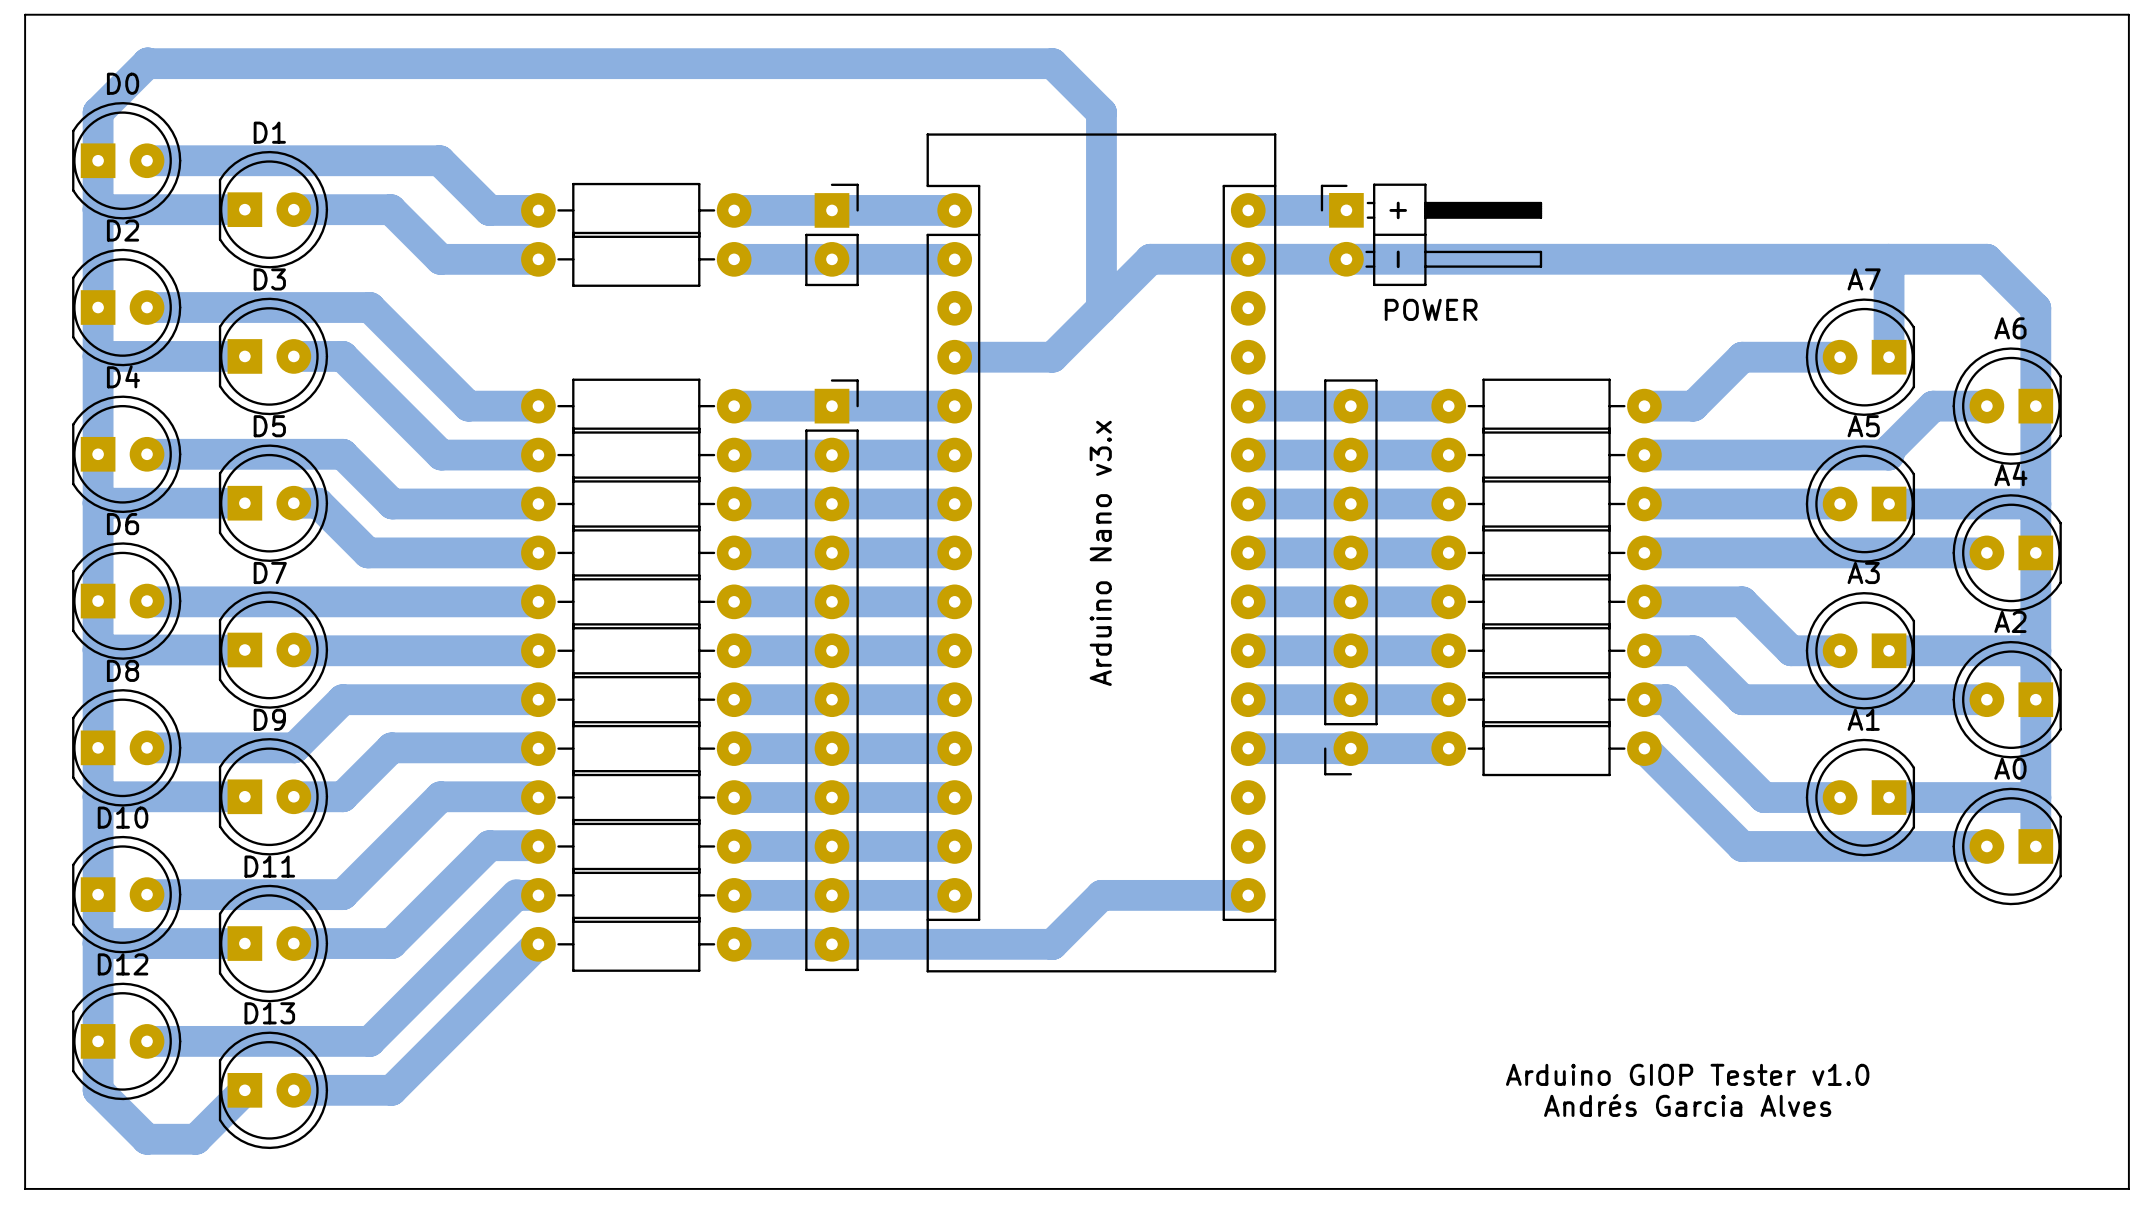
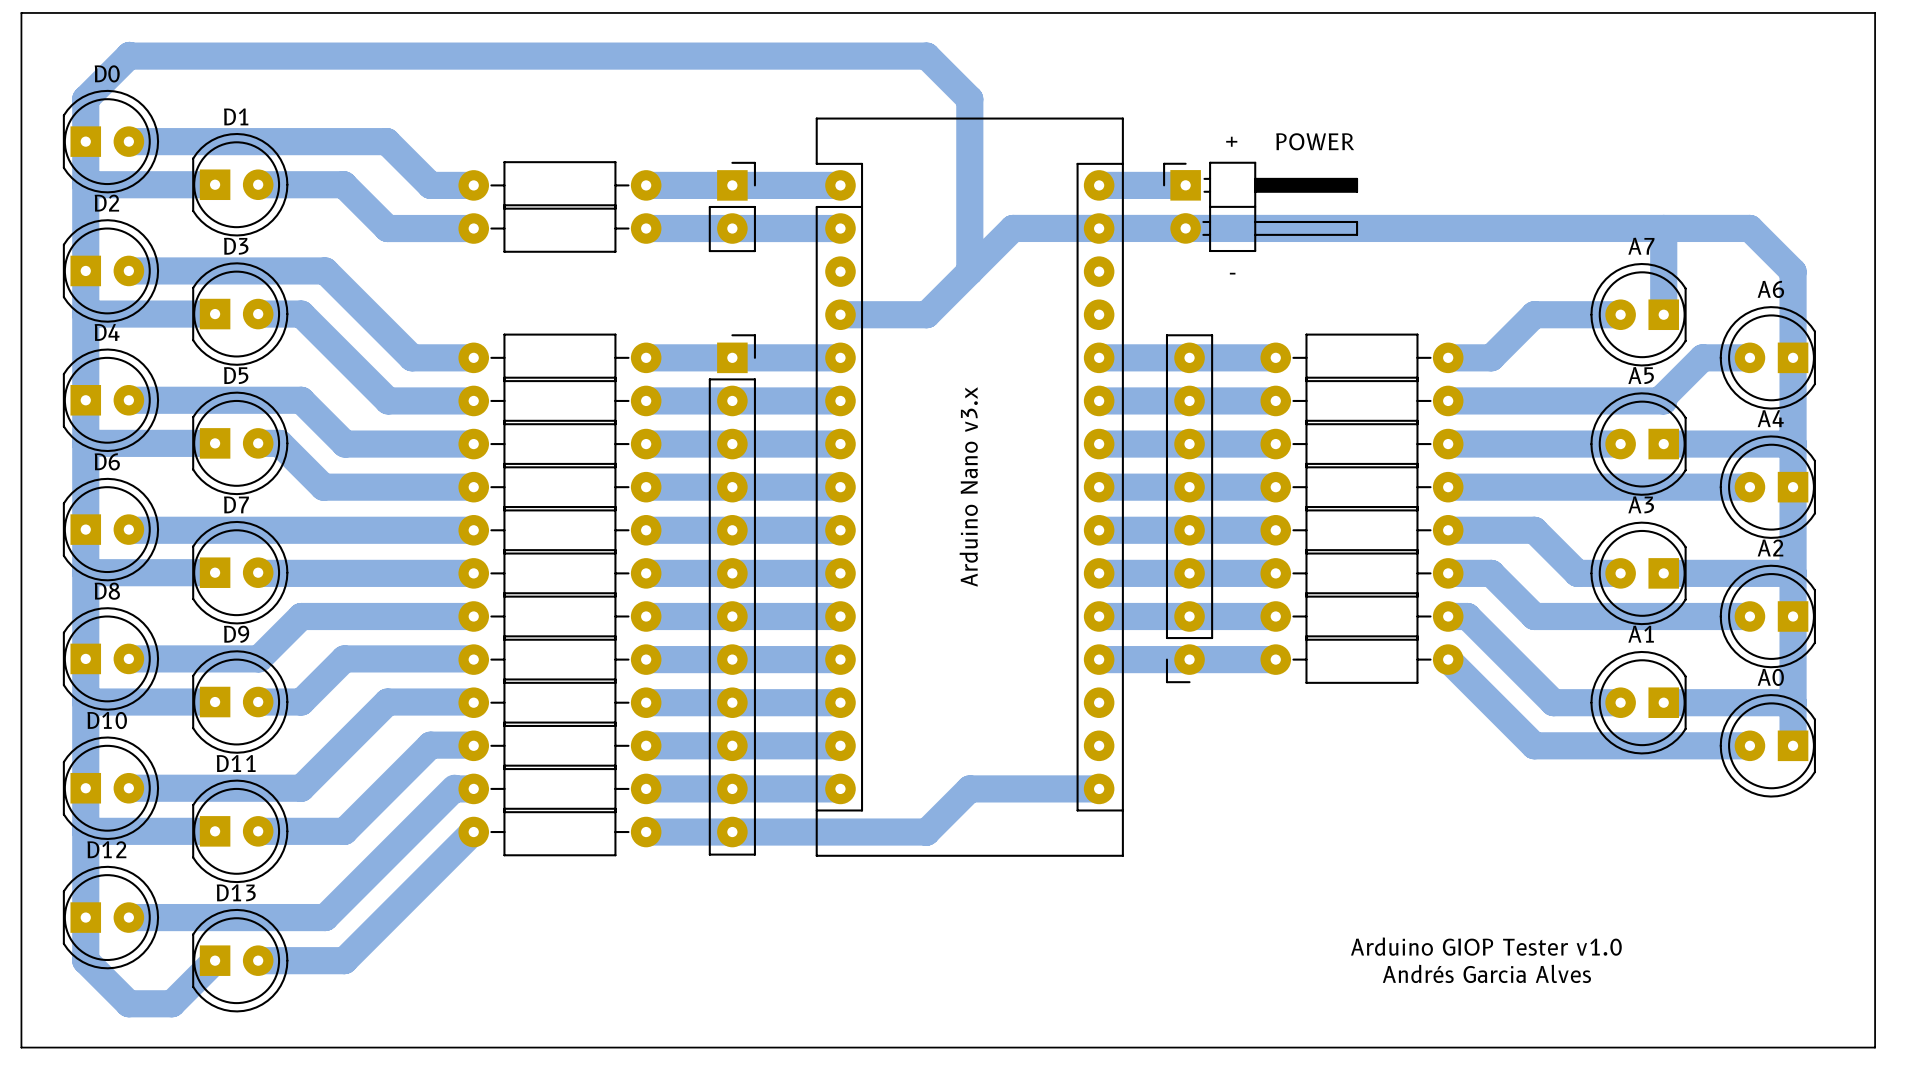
text position: + (1398, 210) -> + (1231, 141)
text rotation: 0° (1398, 259) -> 90° counterclockwise (1232, 273)
text position: - (1398, 259) -> - (1232, 273)
POWER name position: POWER (1431, 309) -> POWER (1315, 141)

